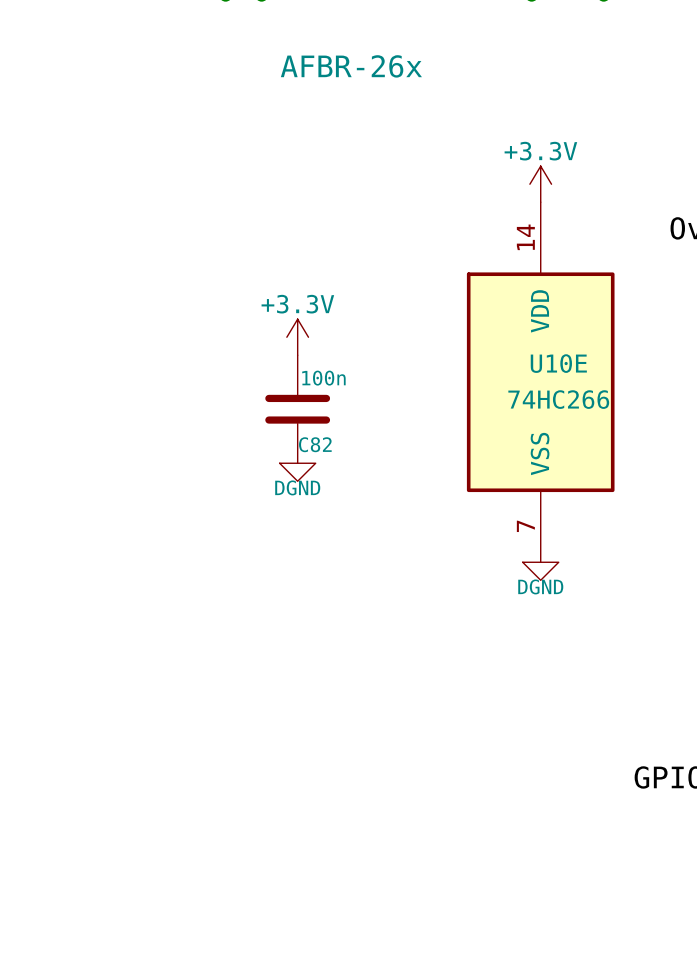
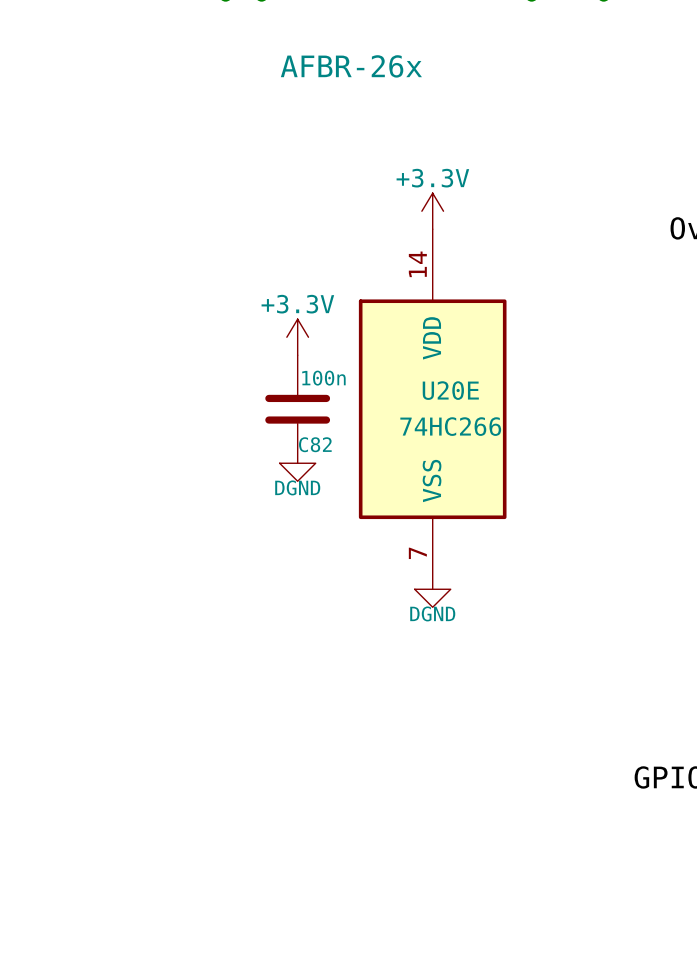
power symbol position: +3.3V (540, 184) -> +3.3V (432, 211)
U10E: 74HC266 (540, 382) -> none
U20E: none -> 74HC266 (432, 409)
power symbol position: DGND (540, 571) -> DGND (432, 598)

